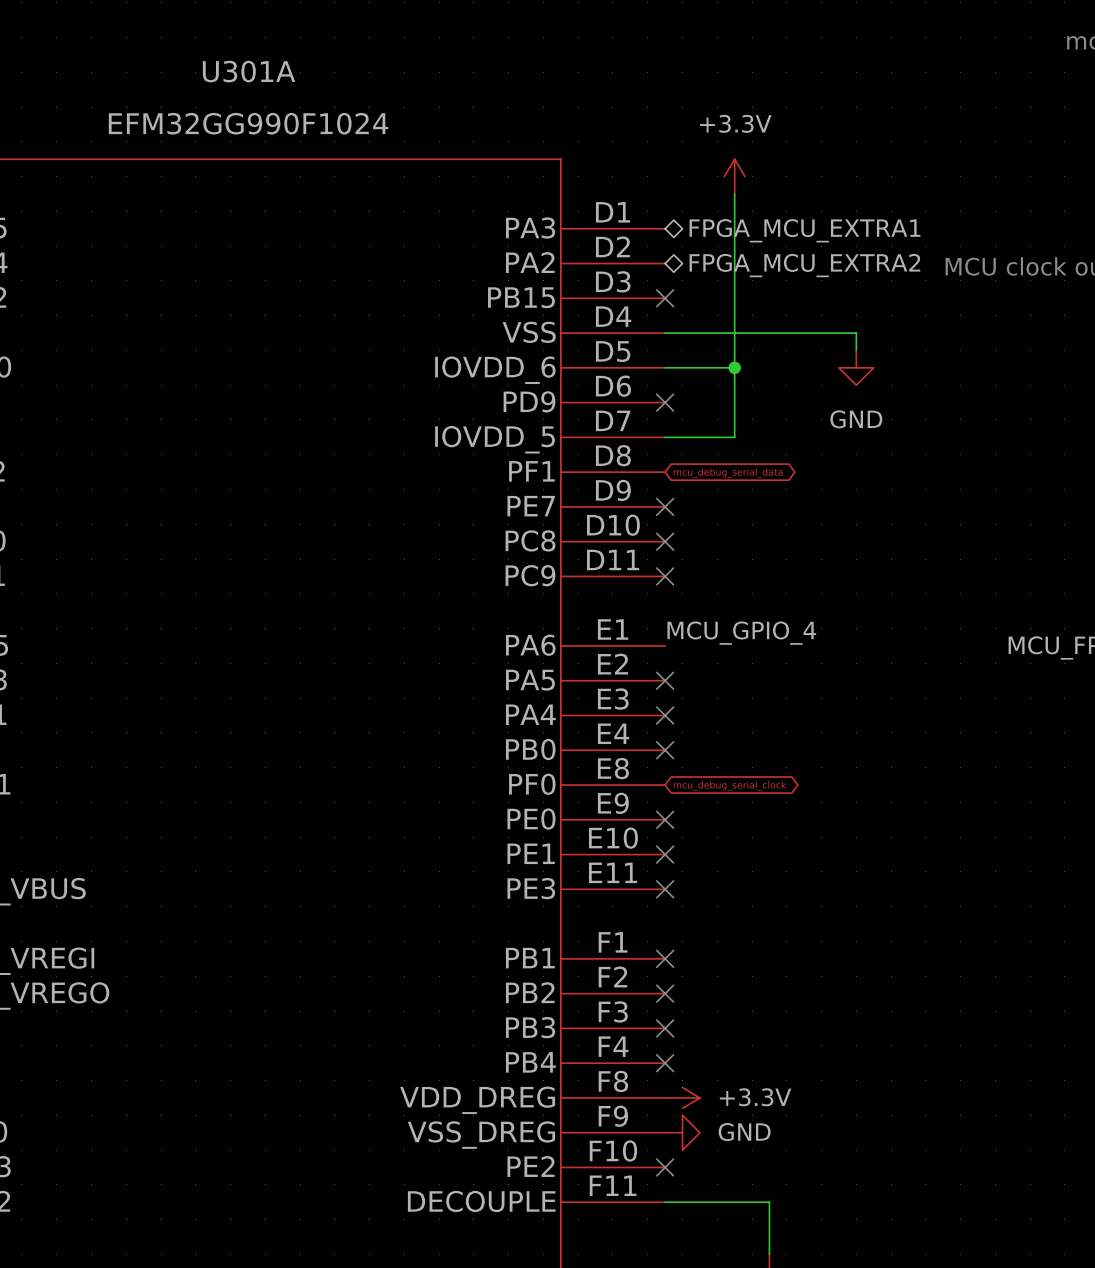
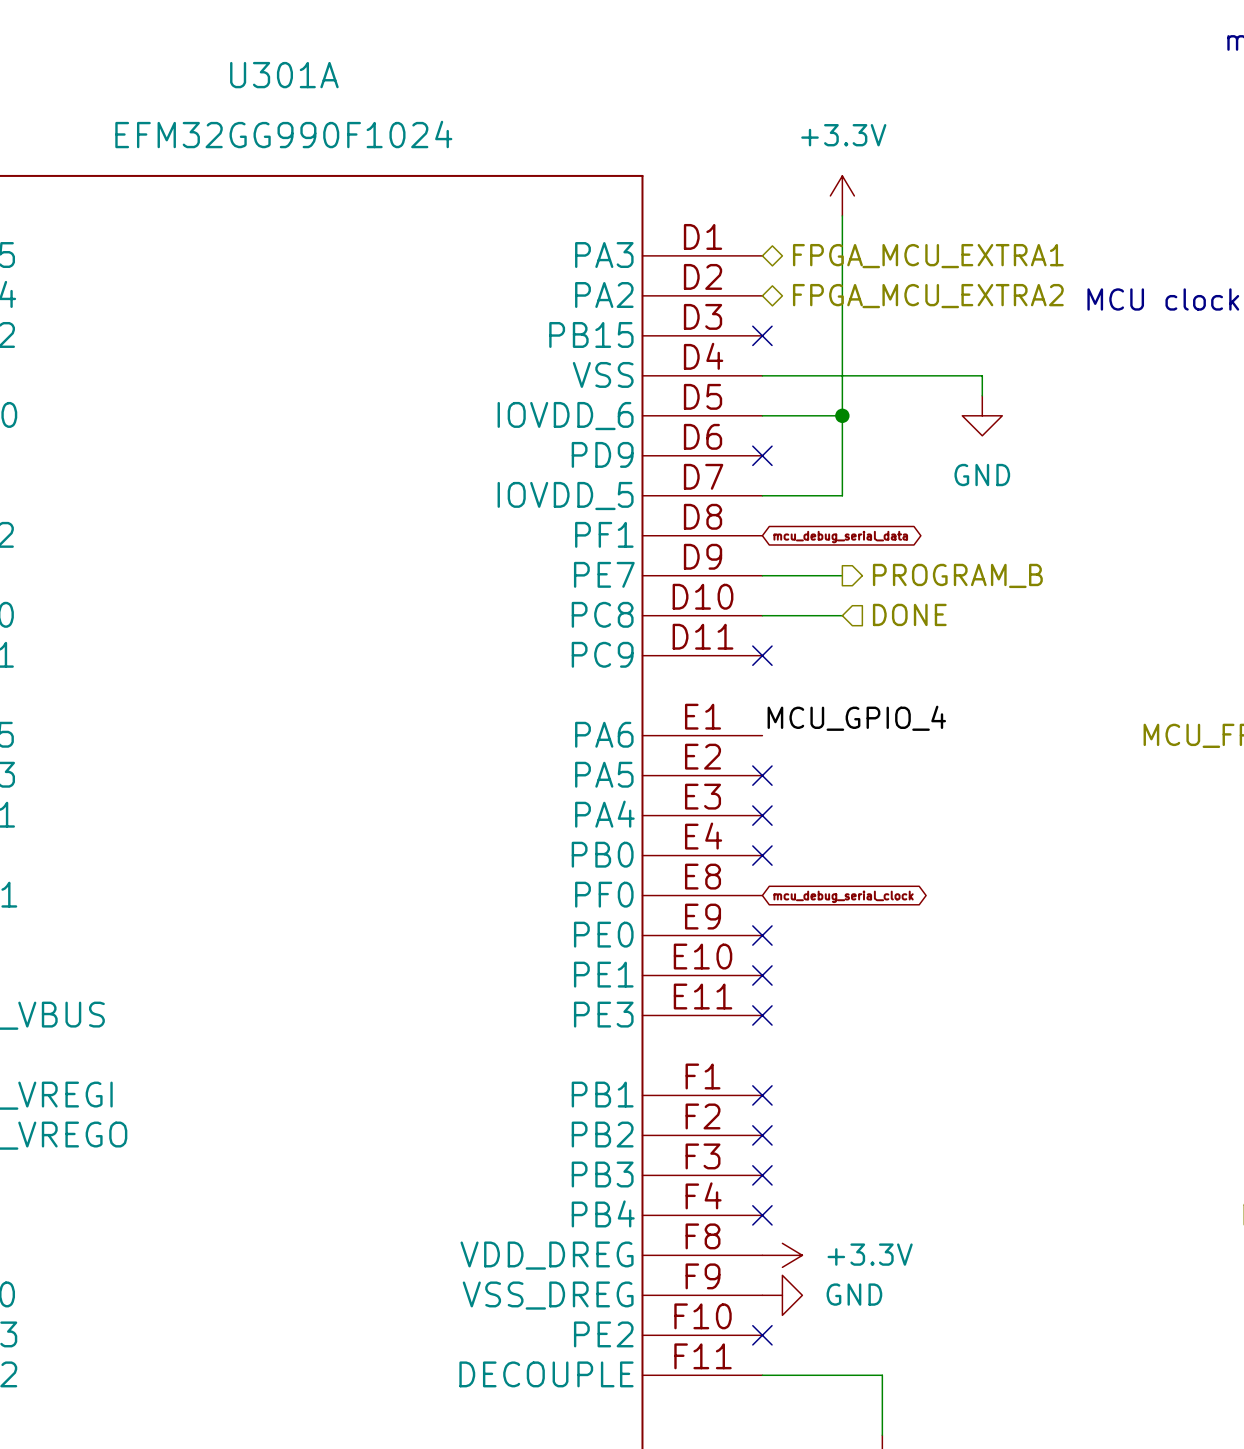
wire: none -> (762, 575) (842, 575)
no-connect mark: (665, 506) -> none
hierarchical label: none -> PROGRAM_B (957, 575)
wire: none -> (762, 615) (842, 615)
no-connect mark: (665, 541) -> none
hierarchical label: none -> DONE (909, 614)

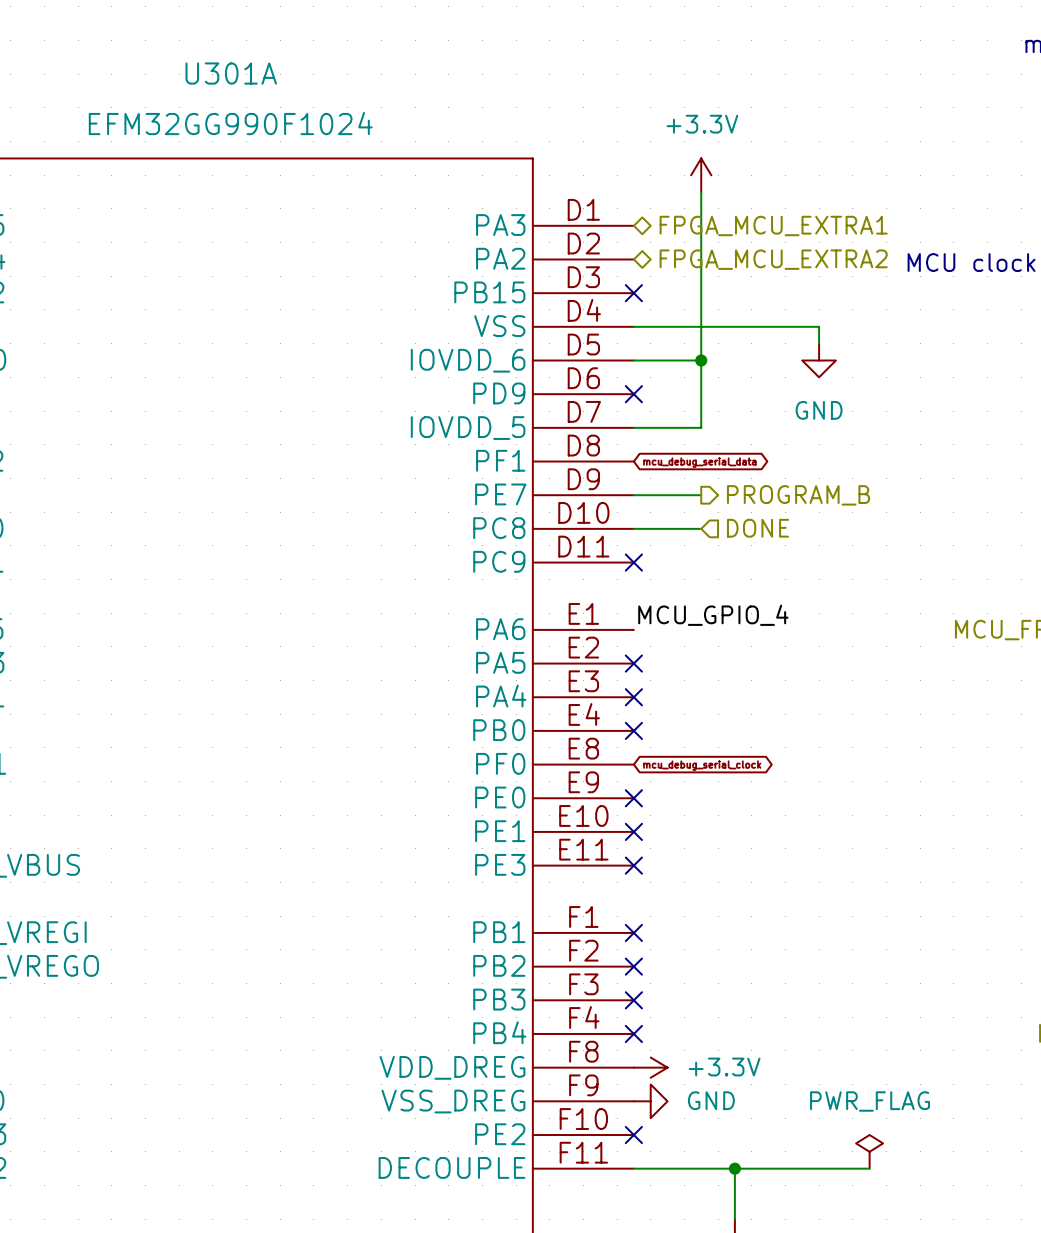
power symbol: none -> PWR_FLAG (869, 1151)
wire: none -> (734, 1168) (869, 1168)
junction: none -> (734, 1168)

